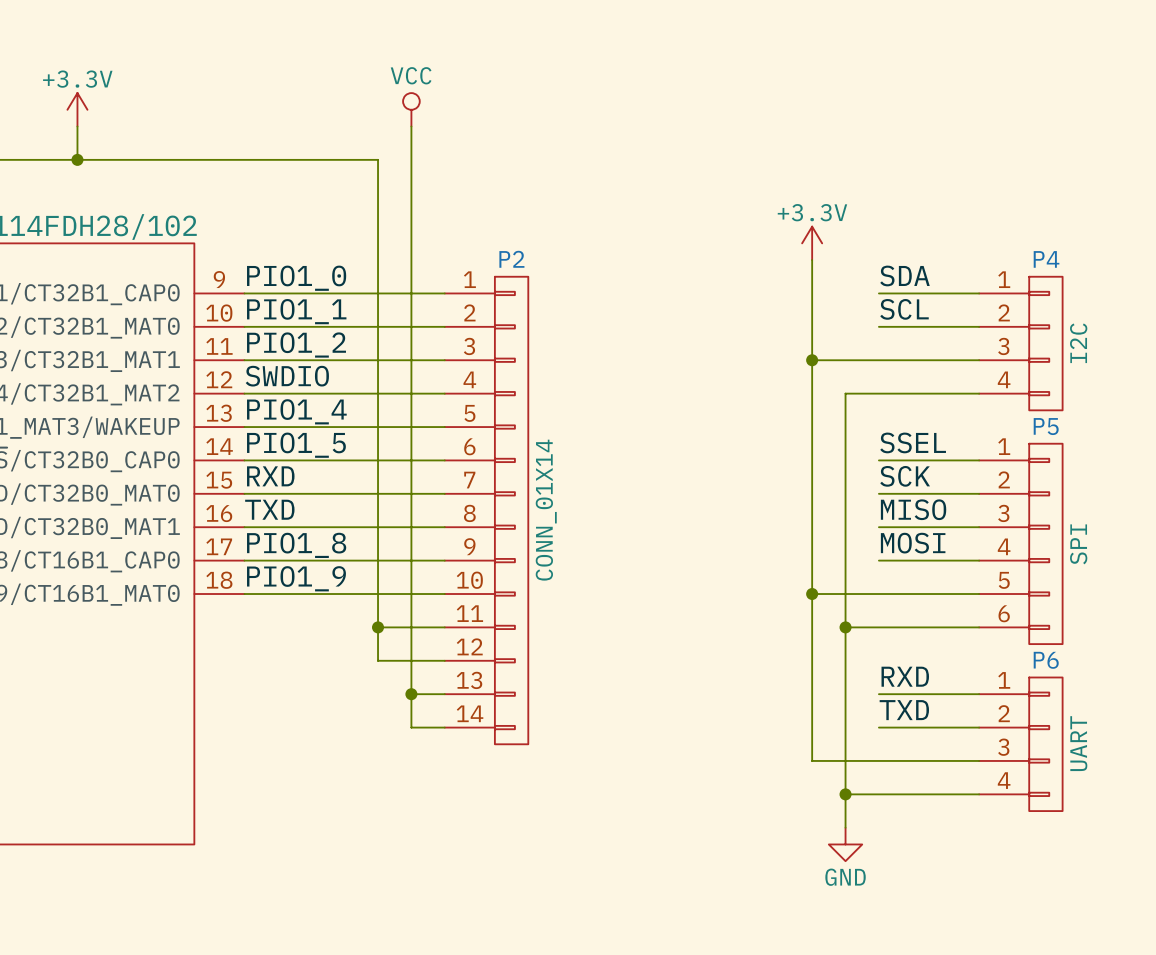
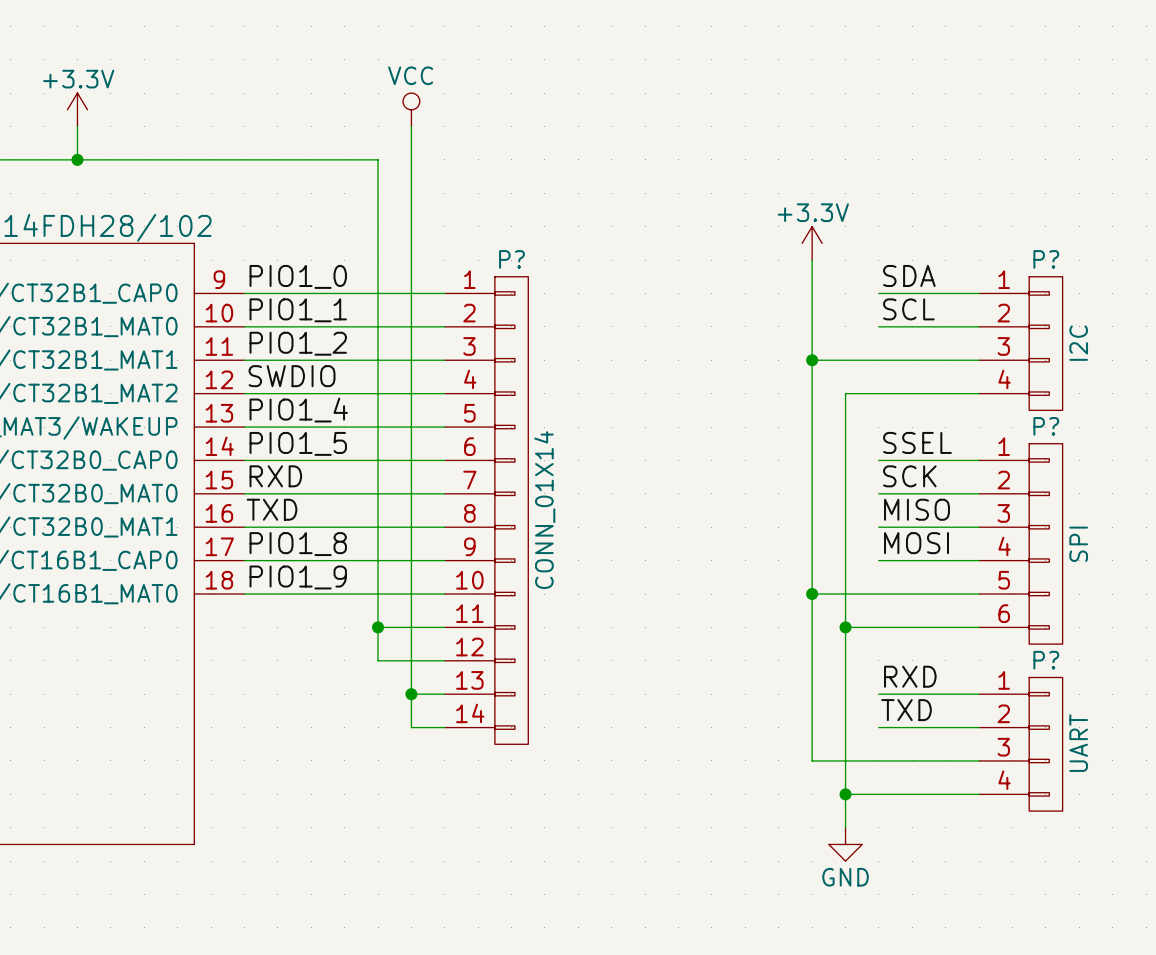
P2 name: P2 (511, 259) -> P? (511, 259)
P4 name: P4 (1046, 259) -> P? (1046, 259)
P5 name: P5 (1046, 426) -> P? (1046, 426)
P6 name: P6 (1046, 660) -> P? (1046, 660)

